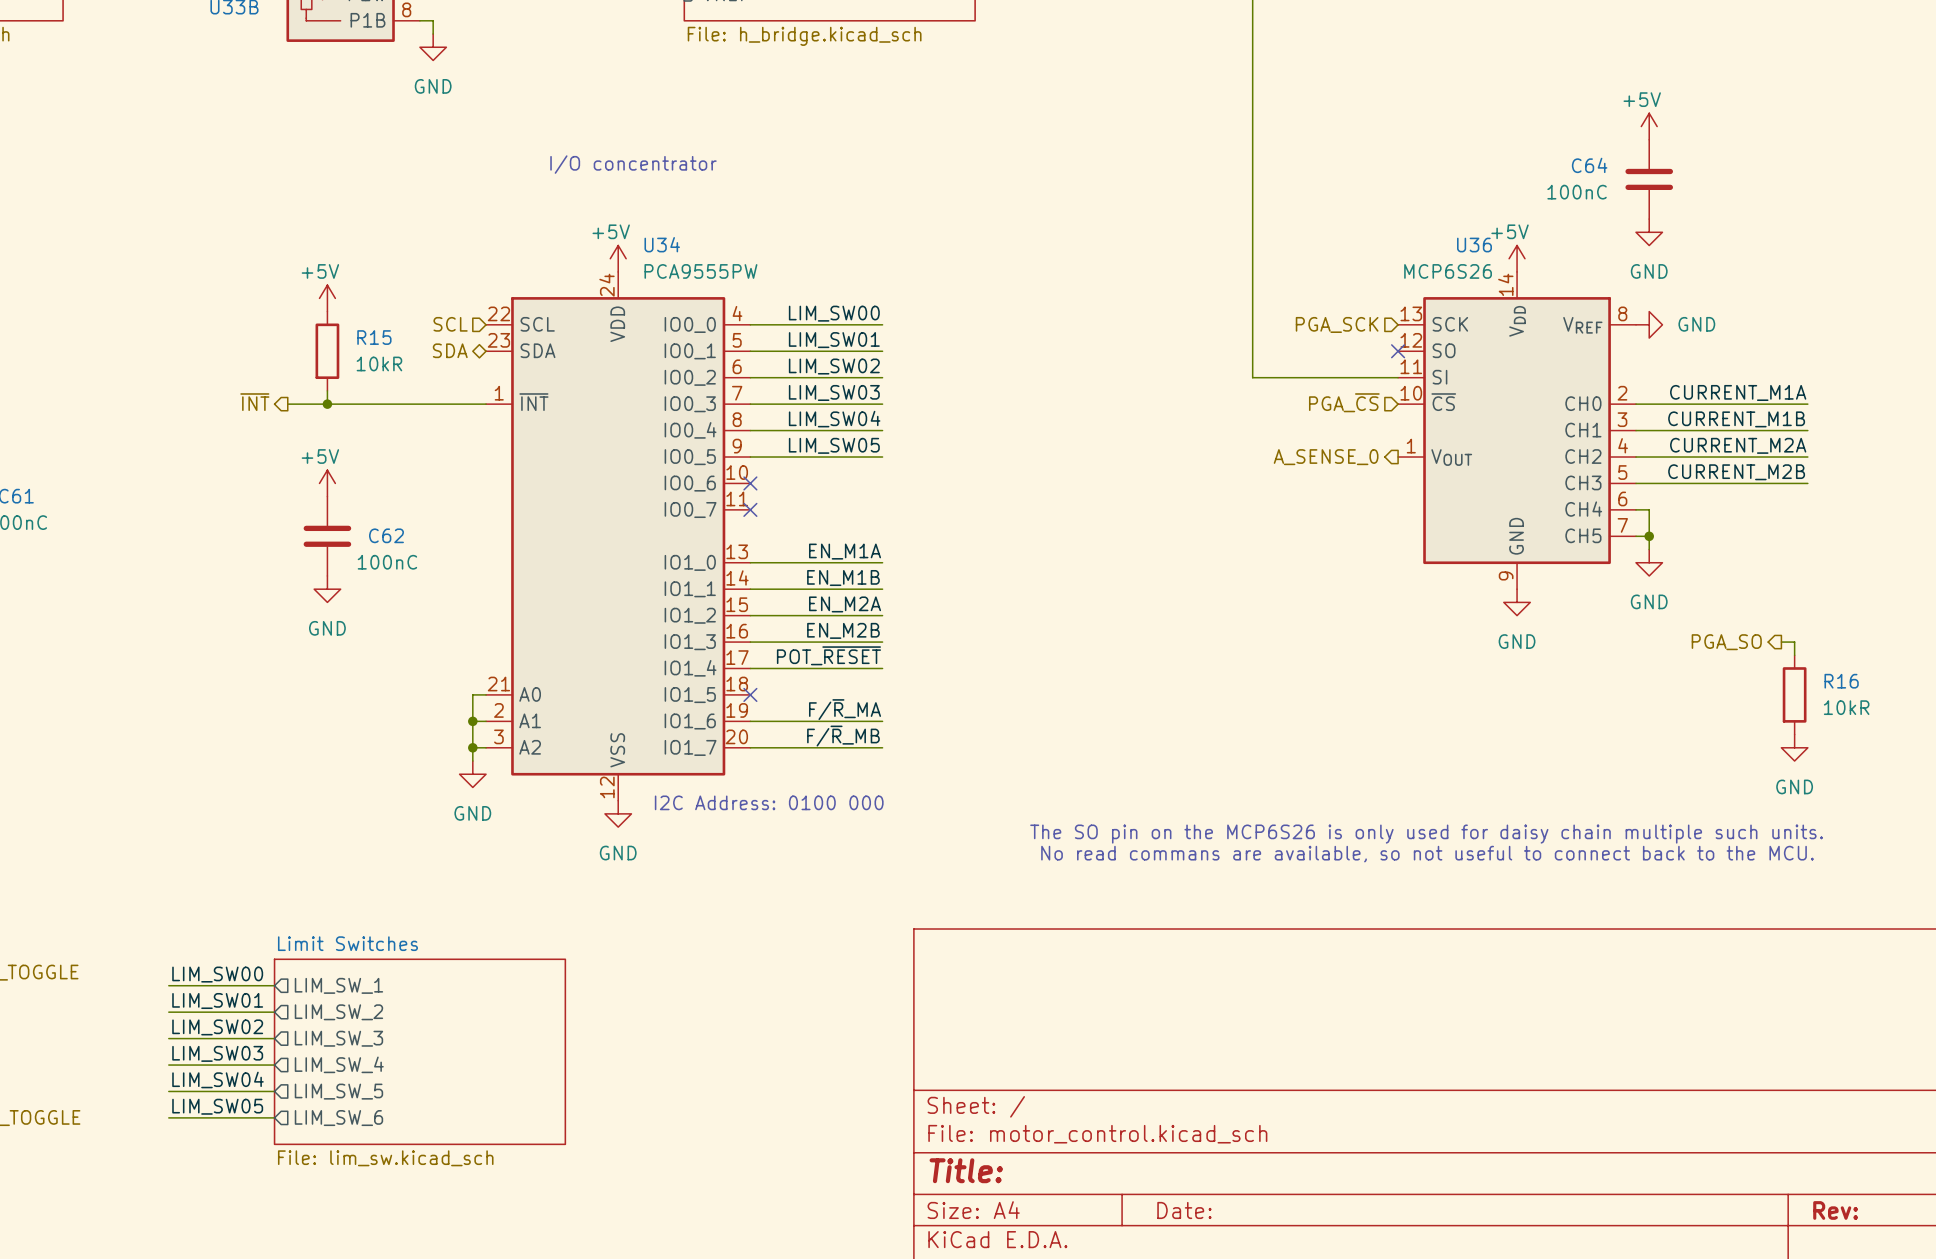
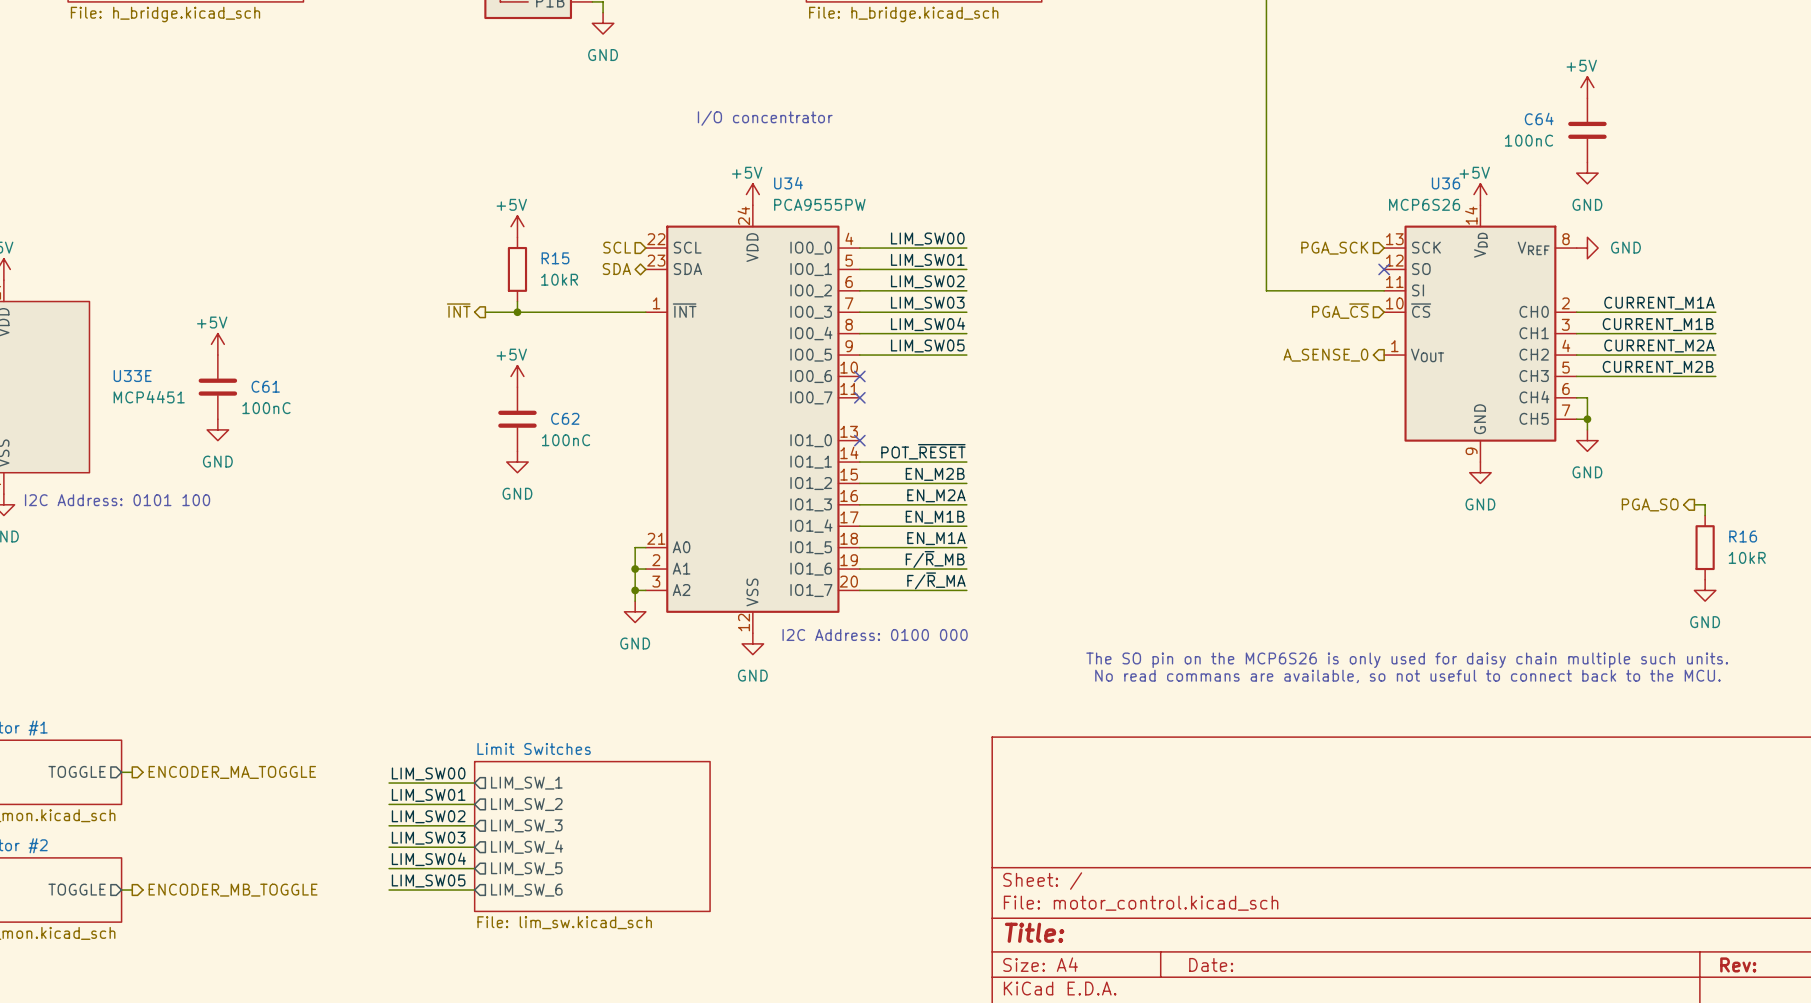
label position: EN_M1A (845, 551) -> EN_M1A (936, 538)
wire: (750, 562) (882, 562) -> (859, 547) (966, 547)
no-connect mark: none -> (859, 440)
label: EN_M1B (843, 578) -> POT_~{RESET} (923, 451)
label: EN_M2A (845, 604) -> EN_M2B (935, 474)
label: EN_M2B (843, 630) -> EN_M2A (936, 495)
label: POT_~{RESET} (828, 655) -> EN_M1B (935, 517)
no-connect mark: (750, 694) -> none
label: F/~{R}_MA (845, 709) -> F/~{R}_MB (935, 559)
label: F/~{R}_MB (843, 736) -> F/~{R}_MA (936, 580)

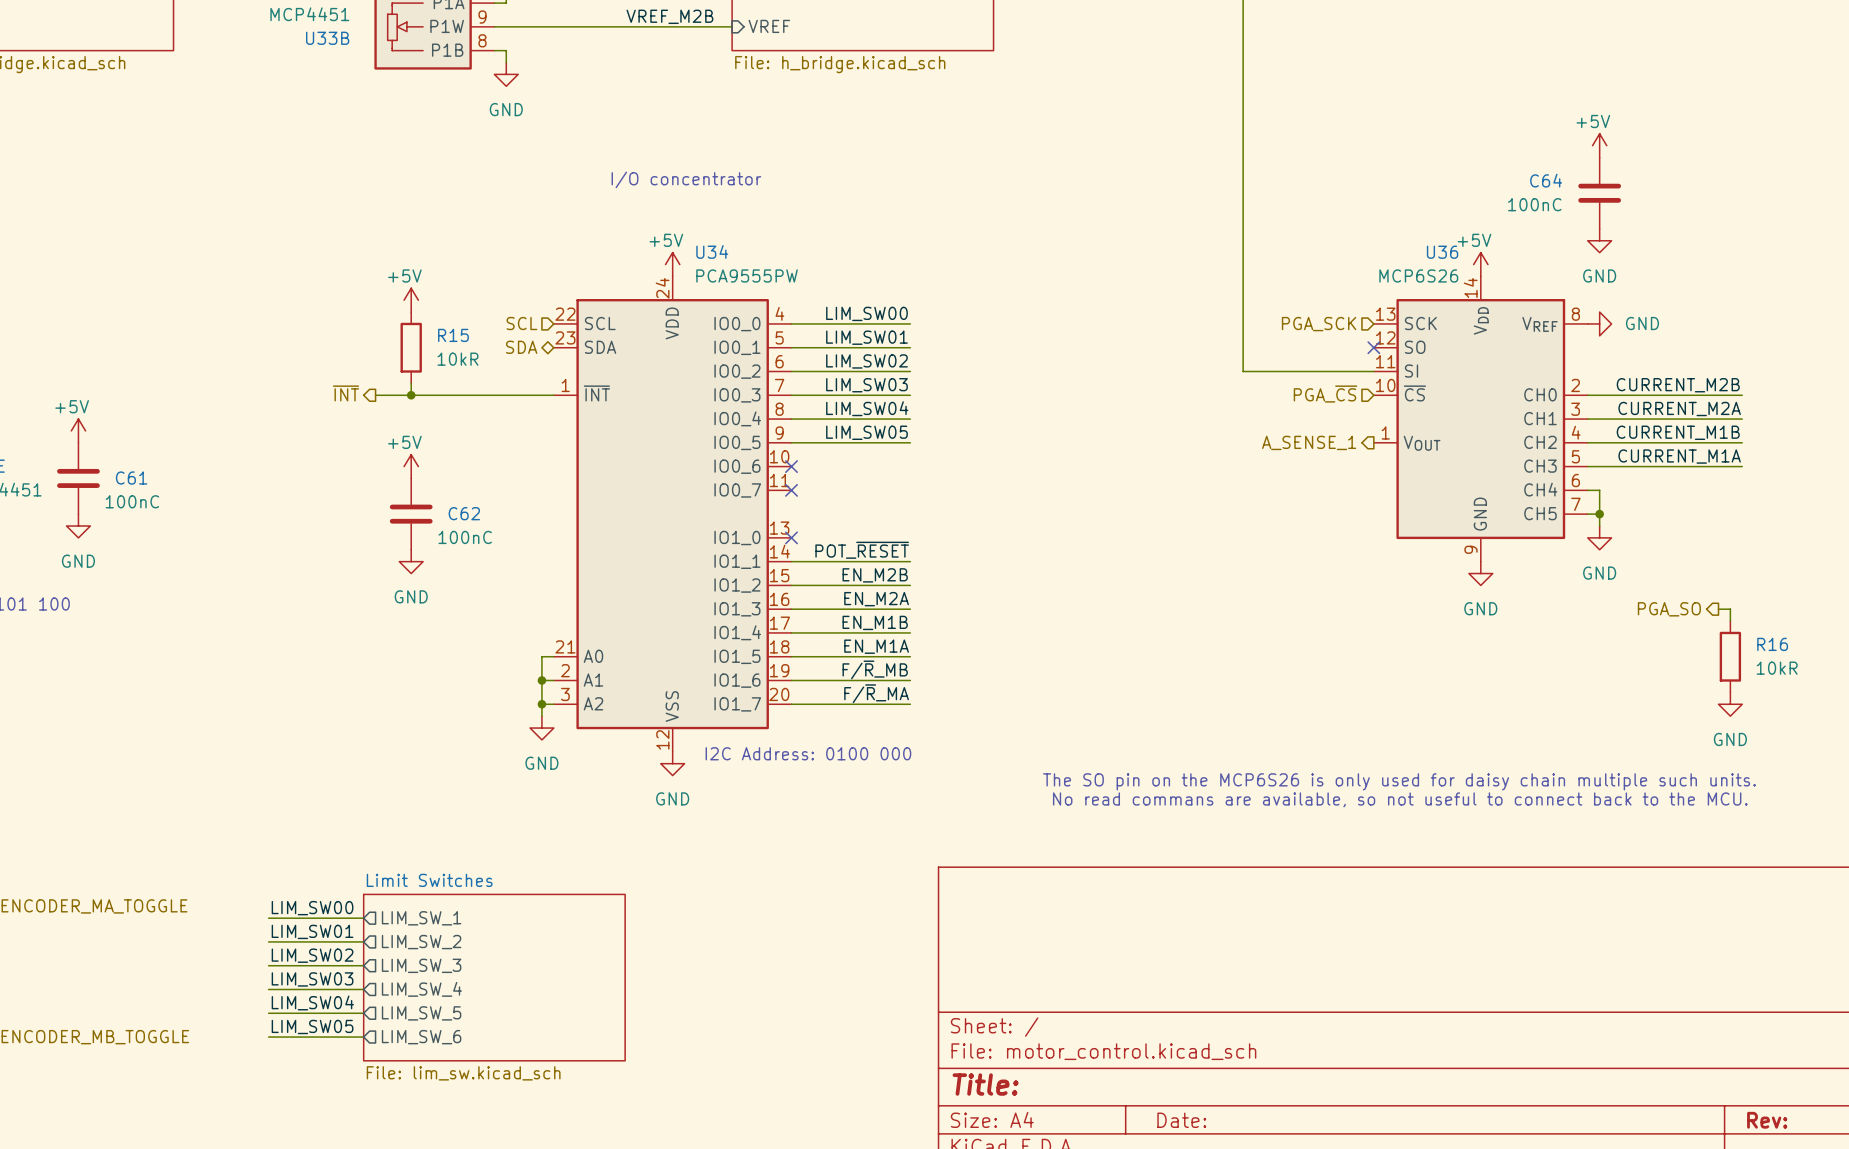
label: CURRENT_M1A (1659, 303) -> CURRENT_M2B (1678, 385)
label: CURRENT_M1B (1658, 324) -> CURRENT_M2A (1679, 409)
label: CURRENT_M2A (1659, 345) -> CURRENT_M1B (1678, 432)
hierarchical label: A_SENSE_0 (1325, 355) -> A_SENSE_1 (1309, 442)
label: CURRENT_M2B (1658, 367) -> CURRENT_M1A (1679, 456)

